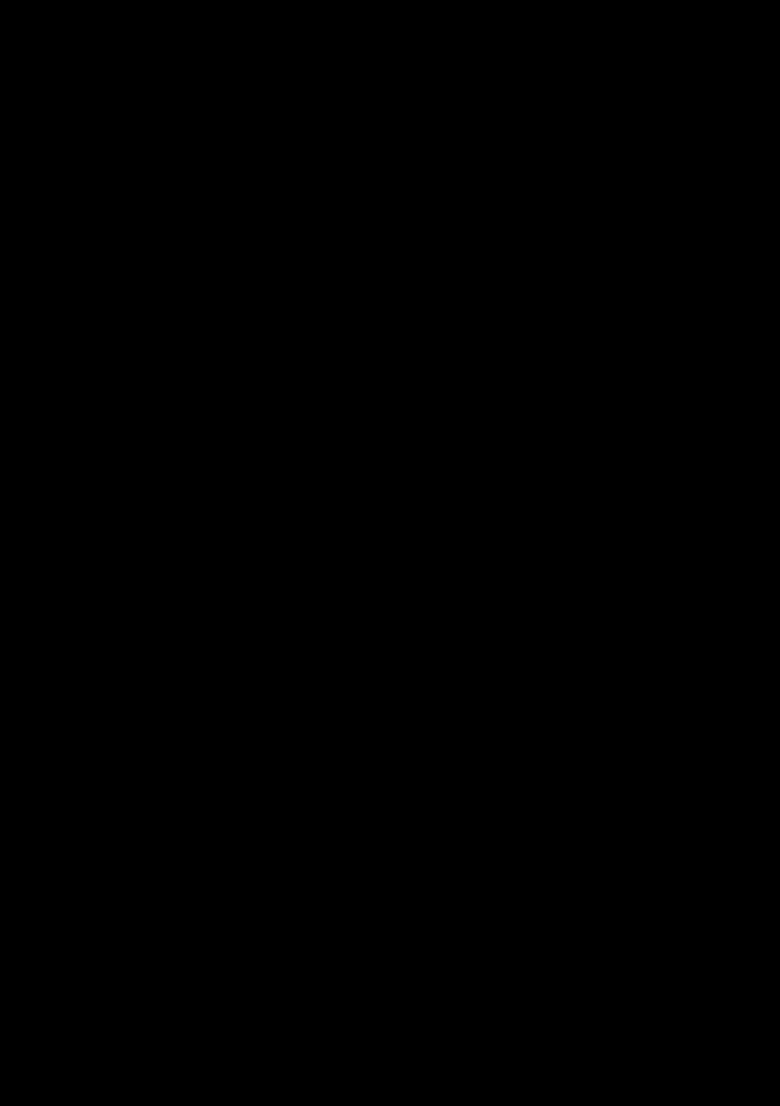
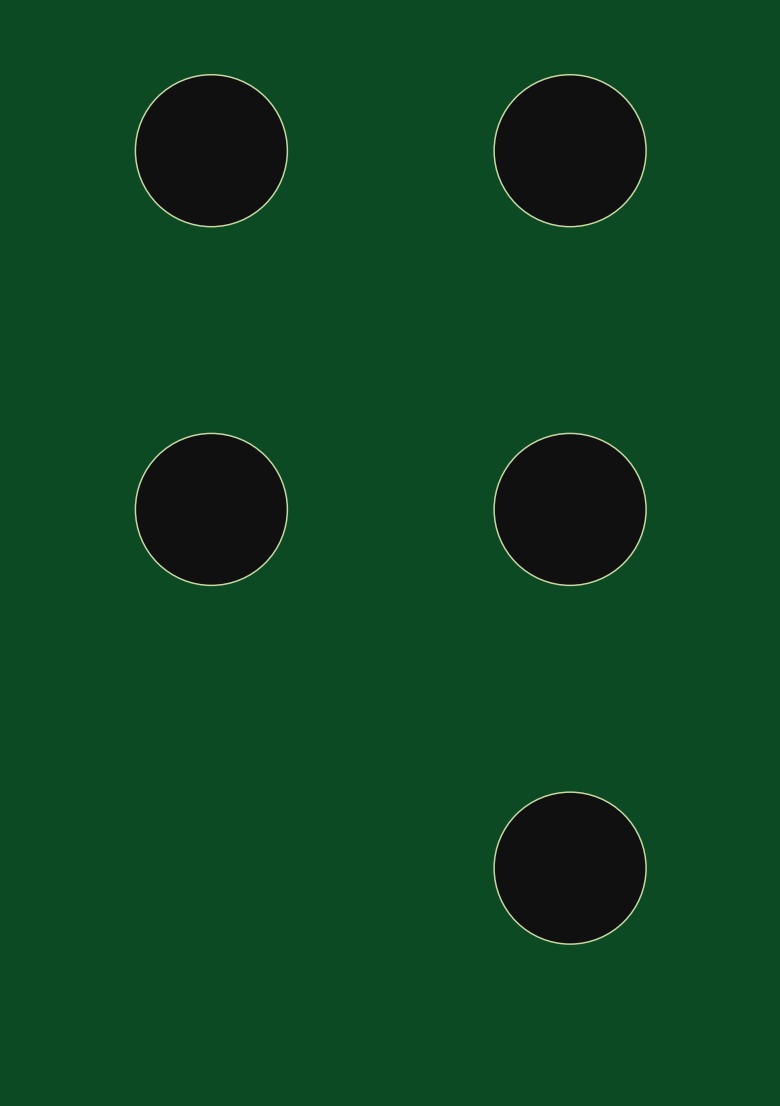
part: none -> (211, 150)
part: none -> (570, 150)
part: none -> (211, 509)
part: none -> (570, 509)
part: none -> (570, 868)

